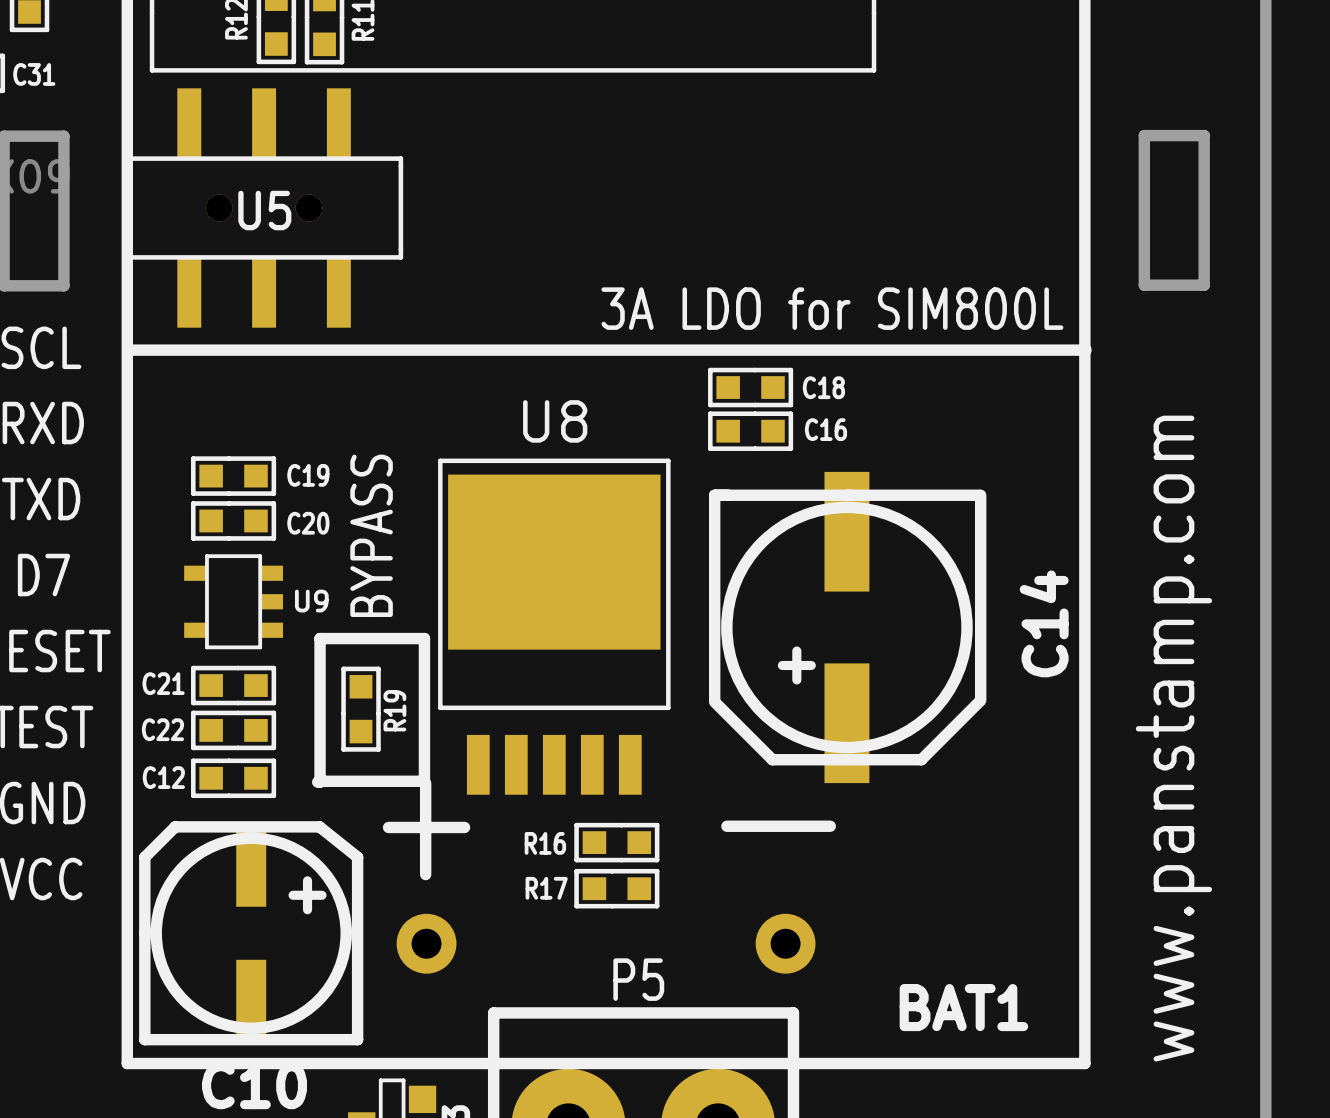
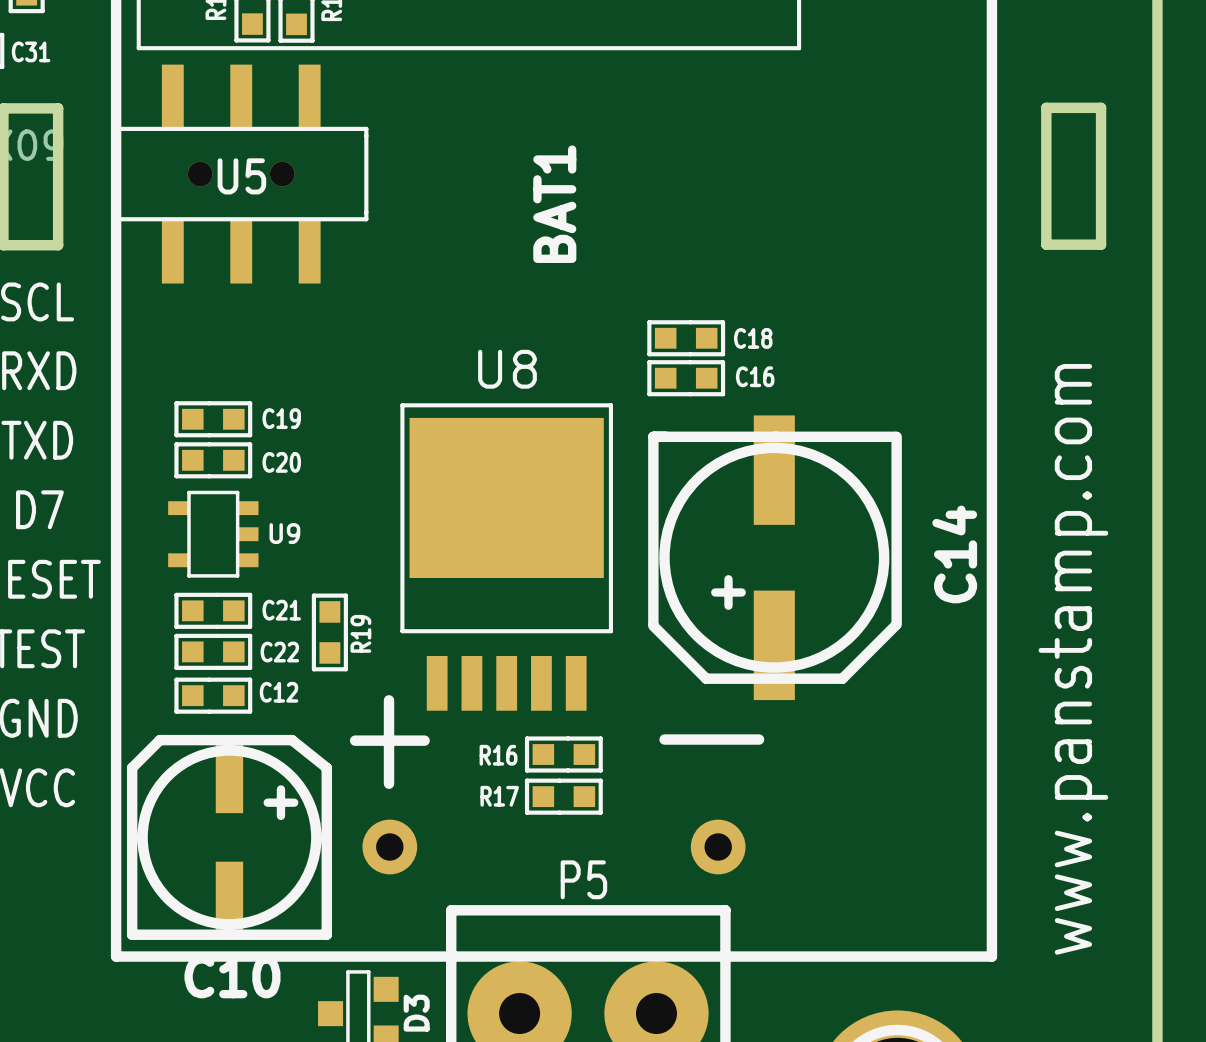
text: 3A LDO for SIM800L (832, 308) -> none
line: (127, 350) (1085, 350) -> none
text: BYPASS (371, 535) -> none
C21 name position: C21 (163, 683) -> C21 (281, 610)
C22 name position: C22 (162, 729) -> C22 (279, 652)
C12 name position: C12 (163, 777) -> C12 (278, 692)
line: (320, 781) (424, 781) (424, 638) (320, 638) (320, 782) (317, 782) -> none
BAT1 name rotation: 0° (963, 1007) -> 90° counterclockwise (554, 204)
BAT1 name position: BAT1 (963, 1007) -> BAT1 (554, 204)

